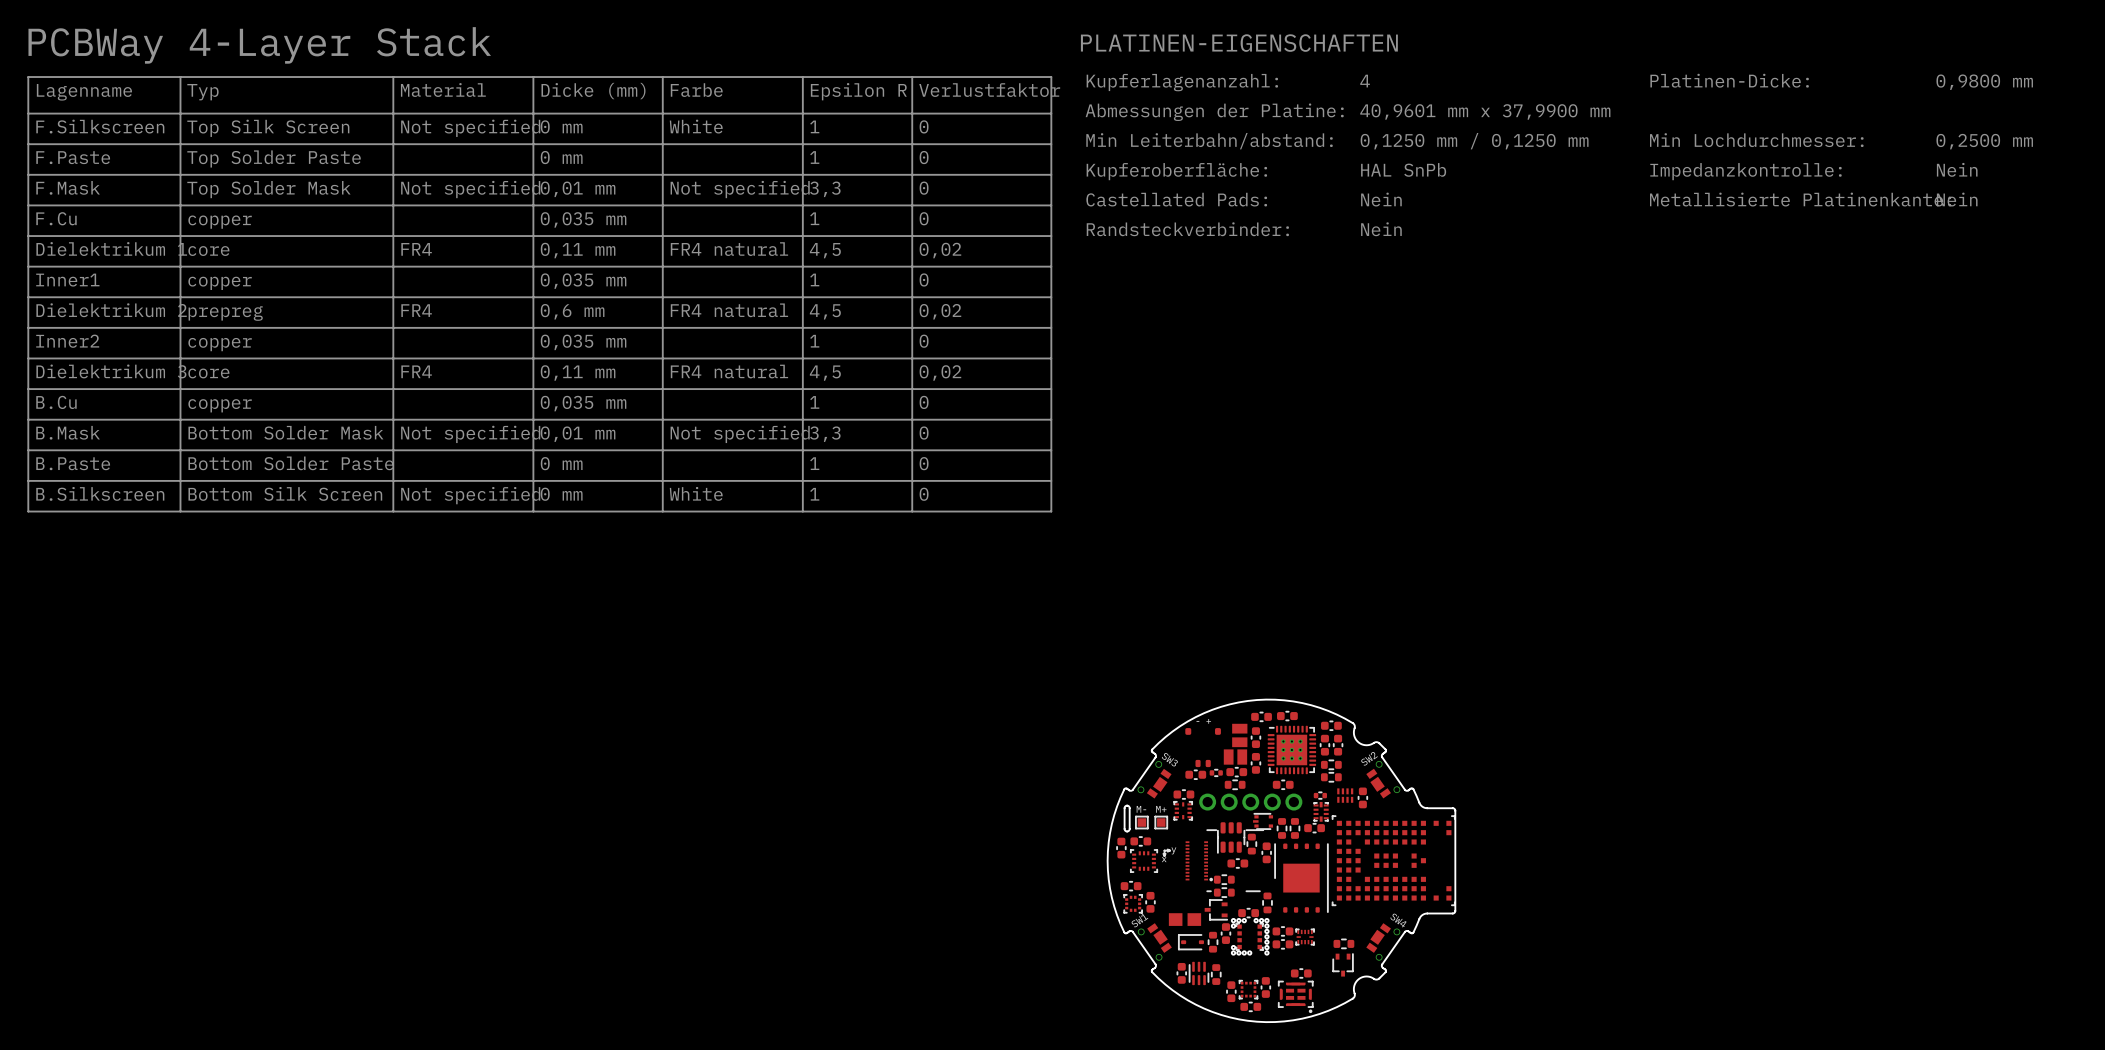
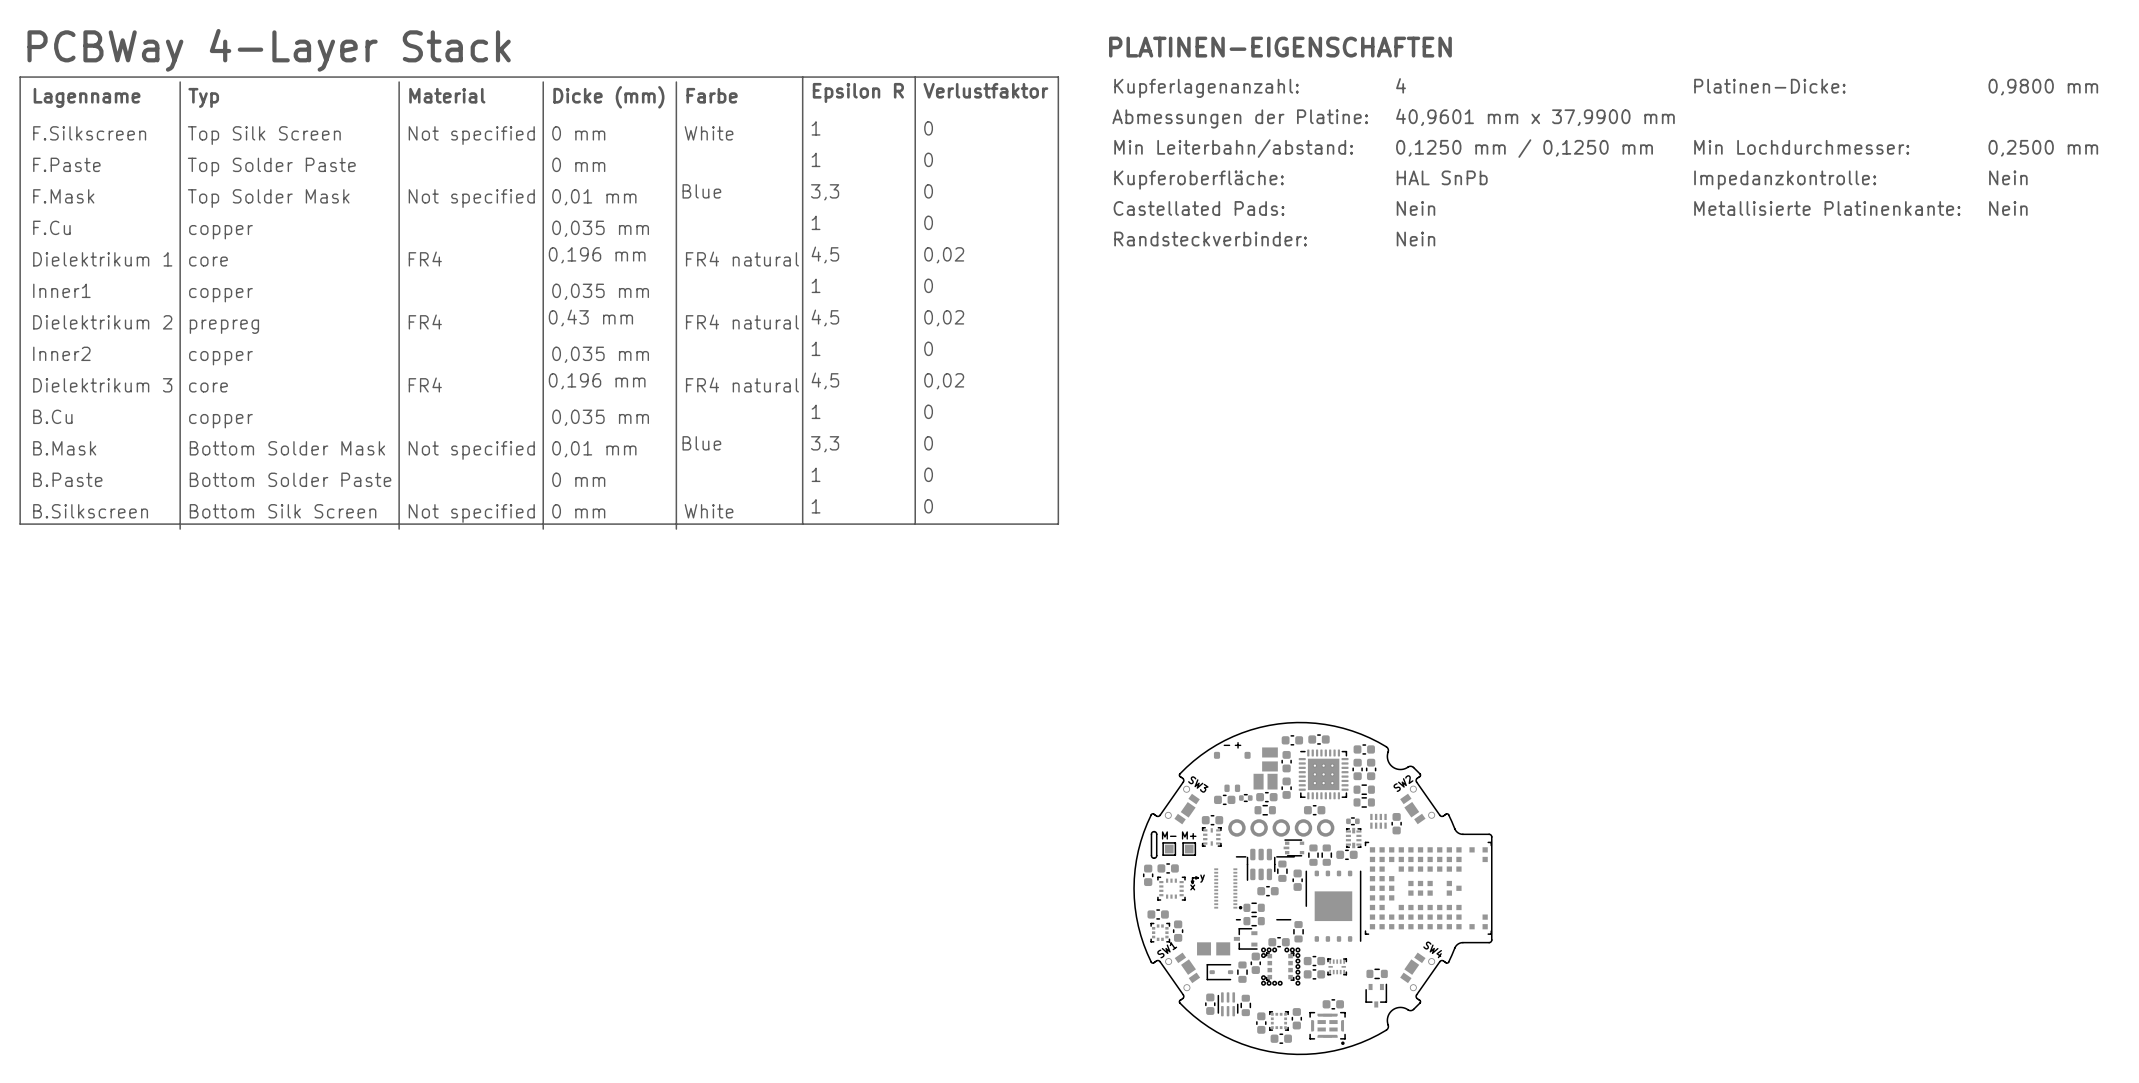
line: (28, 77) (28, 511) (1051, 511) (1051, 77) (28, 77) -> (20, 77) (20, 524) (1058, 524) (1058, 77) (20, 77)
line: (802, 77) (802, 511) -> (802, 77) (802, 524)
line: (912, 77) (912, 511) -> (915, 77) (915, 524)
text position: Verlustfaktor (989, 90) -> Verlustfaktor (985, 90)
text position: Epsilon R (858, 91) -> Epsilon R (858, 92)
line: (28, 113) (1051, 113) -> none
text: none -> 1 (816, 128)
text: none -> 0 (928, 128)
text: 1 (814, 126) -> none
text: 0 (924, 126) -> none
line: (28, 144) (1051, 144) -> none
text: none -> 1 (816, 159)
text: none -> 0 (928, 159)
text: 1 (814, 157) -> none
text: 0 (924, 157) -> none
line: (28, 174) (1051, 174) -> none
text: none -> 0 (928, 191)
text: 0 (924, 188) -> none
text: Not specified (740, 189) -> Blue (701, 191)
text position: 3,3 (825, 189) -> 3,3 (825, 192)
line: (28, 205) (1051, 205) -> none
text: none -> 0 (928, 222)
text position: 1 (814, 218) -> 1 (816, 222)
text: 0 (924, 218) -> none
line: (28, 236) (1051, 236) -> none
text: 0,11 mm (578, 250) -> 0,196 mm (597, 255)
text position: 4,5 (825, 250) -> 4,5 (825, 255)
text position: 0,02 (940, 250) -> 0,02 (944, 255)
line: (28, 266) (1051, 266) -> none
text position: 1 (814, 279) -> 1 (816, 285)
text position: 0 (924, 279) -> 0 (928, 285)
line: (28, 297) (1051, 297) -> none
text: 0,6 mm (572, 311) -> 0,43 mm (590, 317)
text position: 4,5 (825, 311) -> 4,5 (825, 317)
text position: 0,02 (940, 311) -> 0,02 (944, 318)
line: (28, 327) (1051, 327) -> none
text position: 1 (814, 341) -> 1 (816, 348)
text position: 0 (924, 341) -> 0 (928, 348)
line: (28, 358) (1051, 358) -> none
text: 0,11 mm (578, 372) -> 0,196 mm (597, 381)
text position: 0,02 (940, 372) -> 0,02 (944, 381)
text position: 4,5 (825, 373) -> 4,5 (825, 380)
line: (28, 389) (1051, 389) -> none
text: none -> 0 (928, 411)
text position: 1 (814, 402) -> 1 (816, 411)
text: 0 (924, 402) -> none
line: (28, 419) (1051, 419) -> none
text: none -> 0 (928, 443)
text: 0 (924, 433) -> none
text: Not specified (740, 434) -> Blue (701, 443)
text position: 3,3 (825, 434) -> 3,3 (825, 444)
line: (28, 450) (1051, 450) -> none
text: none -> 1 (816, 474)
text: none -> 0 (928, 474)
text: 1 (814, 463) -> none
text: 0 (924, 463) -> none
line: (28, 480) (1051, 480) -> none
text: none -> 1 (816, 506)
text: none -> 0 (928, 506)
text: 1 (814, 494) -> none
text: 0 (924, 494) -> none

